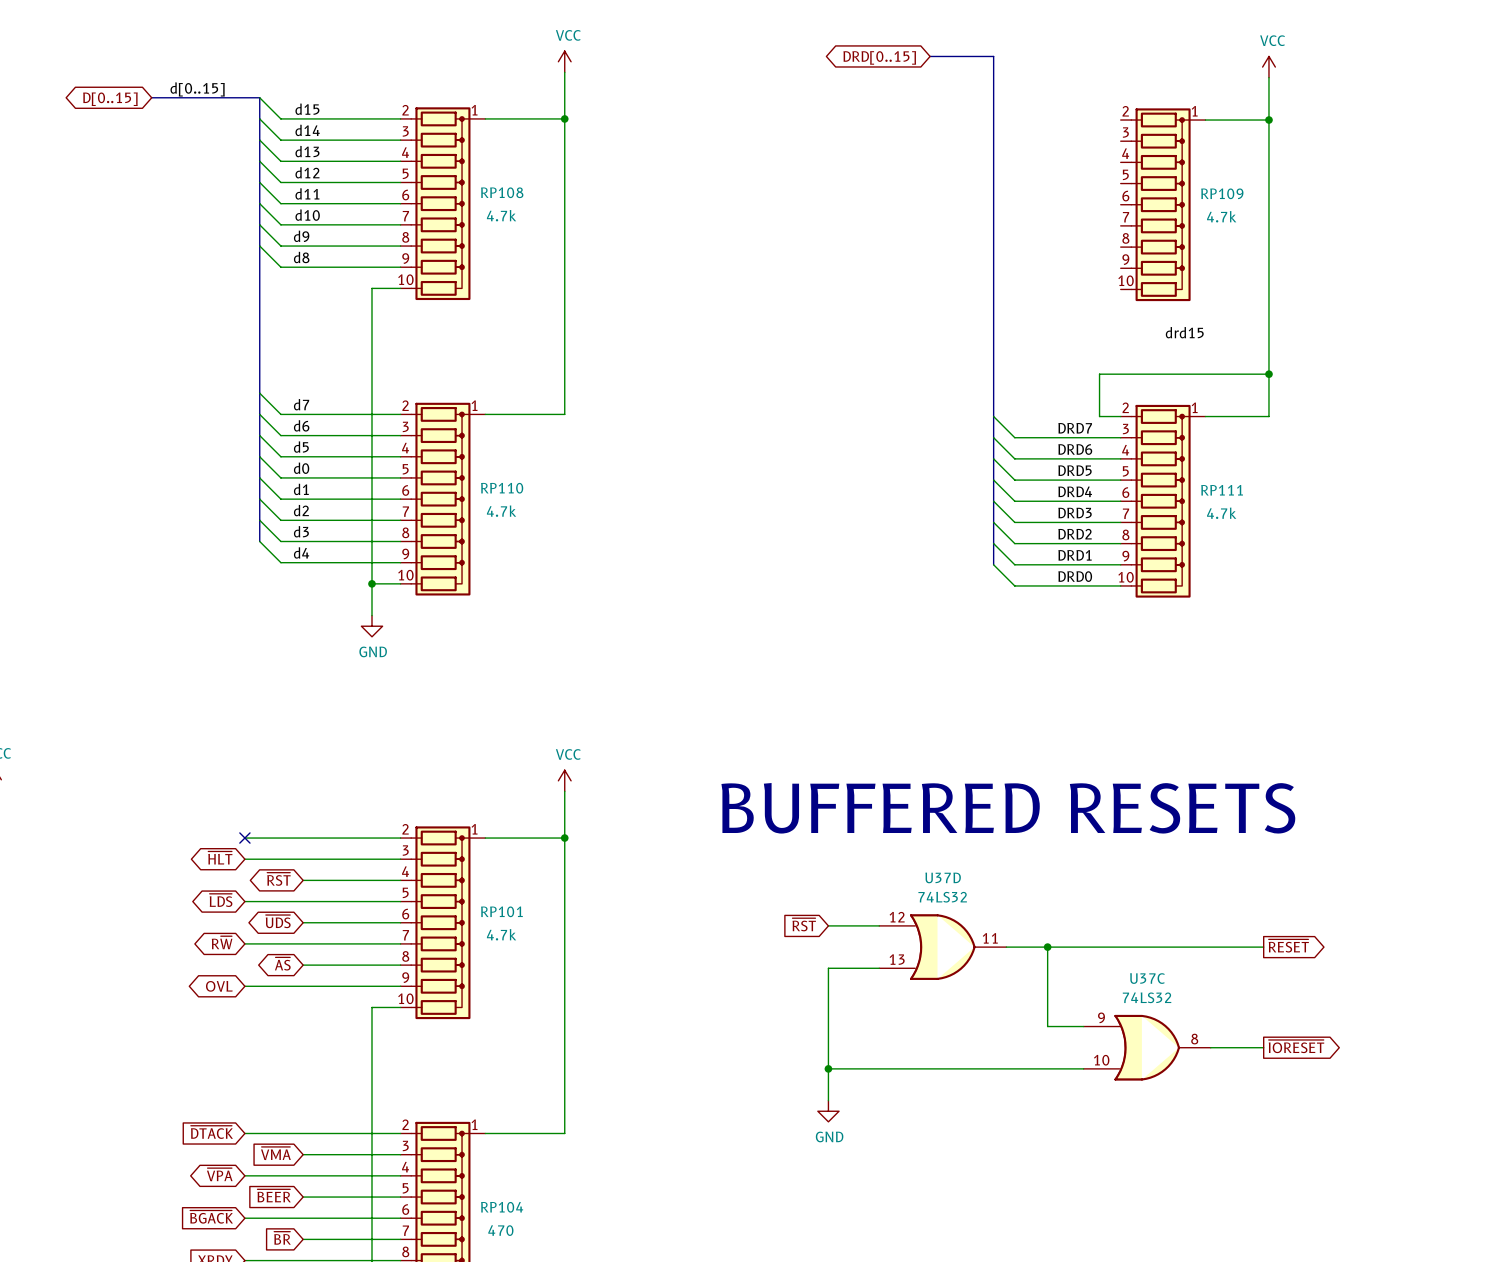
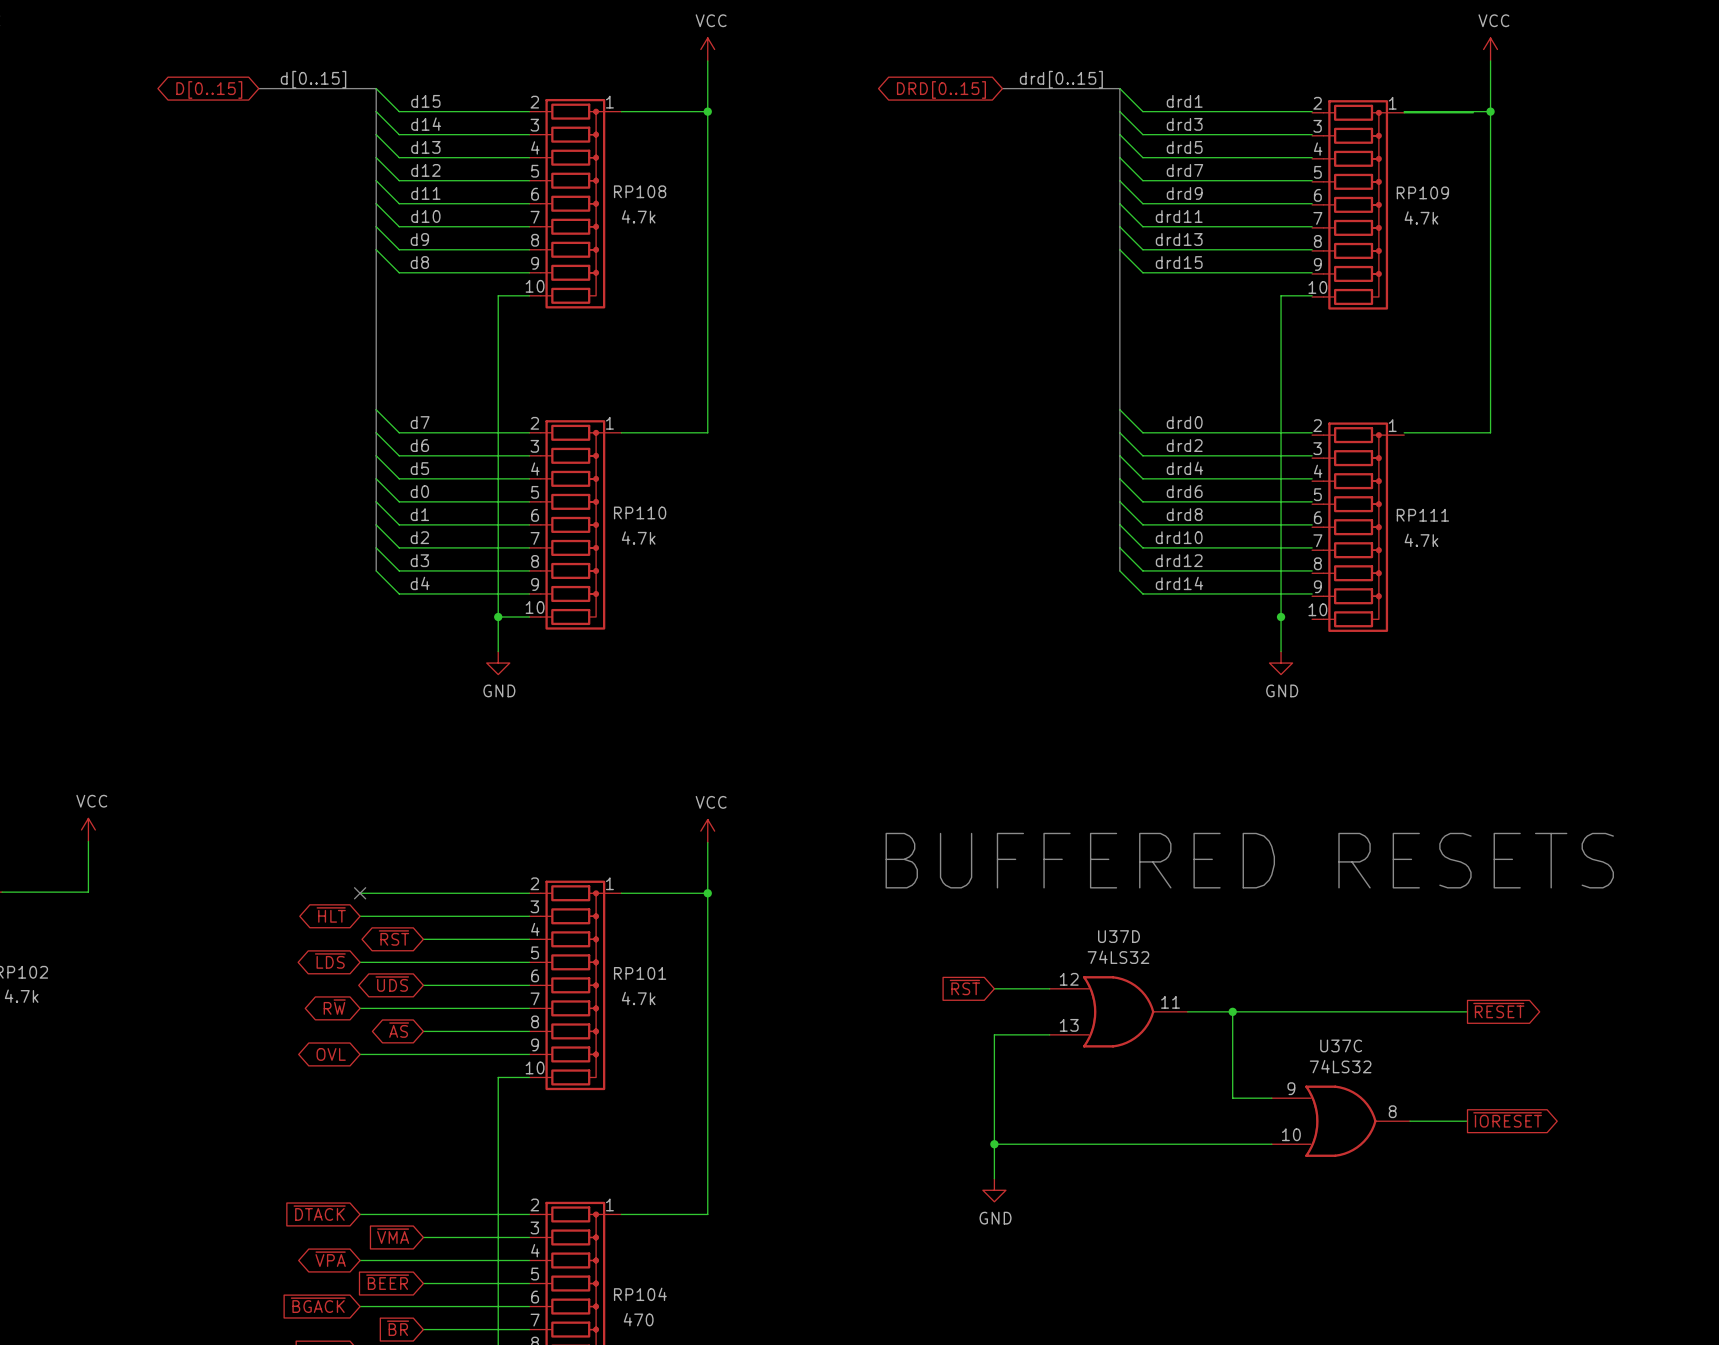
bus: (930, 56) (993, 56) (993, 564) -> none
global label position: DRD[0..15] (879, 57) -> DRD[0..15] (941, 89)
power symbol position: VCC (1268, 67) -> VCC (1490, 49)
wire: none -> (1490, 60) (1490, 432) (1404, 432)
wire: (1268, 77) (1268, 416) (1205, 416) -> none
label: none -> drd[0..15] (1061, 79)
bus: none -> (1002, 88) (1119, 88) (1119, 570)
wire: none -> (1119, 88) (1142, 111) (1312, 111)
label: none -> drd1 (1184, 101)
wire: none -> (1119, 111) (1142, 134) (1312, 134)
wire: none -> (1404, 111) (1490, 111)
junction position: (1268, 120) -> (1490, 111)
label: none -> drd3 (1184, 124)
wire: none -> (1119, 134) (1142, 157) (1312, 157)
label: none -> drd5 (1184, 147)
wire: none -> (1119, 157) (1142, 180) (1312, 180)
label: none -> drd7 (1184, 170)
wire: none -> (1119, 180) (1142, 203) (1312, 203)
label: none -> drd9 (1184, 193)
wire: none -> (1119, 203) (1142, 226) (1312, 226)
label: none -> drd11 (1179, 216)
wire: none -> (1119, 226) (1142, 249) (1312, 249)
label: none -> drd13 (1179, 239)
wire: none -> (1119, 249) (1142, 272) (1312, 272)
wire: none -> (1312, 295) (1281, 295) (1281, 651)
label position: drd15 (1184, 332) -> drd15 (1179, 262)
wire: (1268, 374) (1099, 374) (1099, 416) (1120, 416) -> none
junction: (1268, 374) -> none
wire: none -> (1119, 409) (1142, 432) (1312, 432)
label: none -> drd0 (1184, 422)
wire: none -> (1119, 432) (1142, 455) (1312, 455)
wire: (993, 416) (1014, 437) (1120, 437) -> none
label: none -> drd2 (1184, 445)
label: DRD7 (1075, 428) -> none
wire: none -> (1119, 455) (1142, 478) (1312, 478)
wire: (993, 437) (1014, 458) (1120, 458) -> none
label: none -> drd4 (1184, 468)
label: DRD6 (1075, 449) -> none
wire: none -> (1119, 478) (1142, 501) (1312, 501)
wire: (993, 458) (1014, 480) (1120, 480) -> none
label: none -> drd6 (1184, 491)
label: DRD5 (1075, 470) -> none
wire: none -> (1119, 501) (1142, 524) (1312, 524)
wire: (993, 480) (1014, 501) (1120, 501) -> none
label: none -> drd8 (1184, 514)
label: DRD4 (1075, 491) -> none
wire: none -> (1119, 524) (1142, 547) (1312, 547)
wire: (993, 501) (1014, 522) (1120, 522) -> none
label: none -> drd10 (1179, 537)
label: DRD3 (1075, 513) -> none
wire: none -> (1119, 547) (1142, 570) (1312, 570)
wire: (993, 522) (1014, 543) (1120, 543) -> none
label: none -> drd12 (1179, 560)
label: DRD2 (1075, 534) -> none
wire: none -> (1119, 570) (1142, 593) (1312, 593)
wire: (993, 543) (1014, 564) (1120, 564) -> none
label: none -> drd14 (1179, 583)
label: DRD1 (1075, 555) -> none
wire: (993, 564) (1014, 585) (1120, 585) -> none
label: DRD0 (1075, 576) -> none
junction: none -> (1281, 616)
power symbol: none -> GND (1281, 663)

